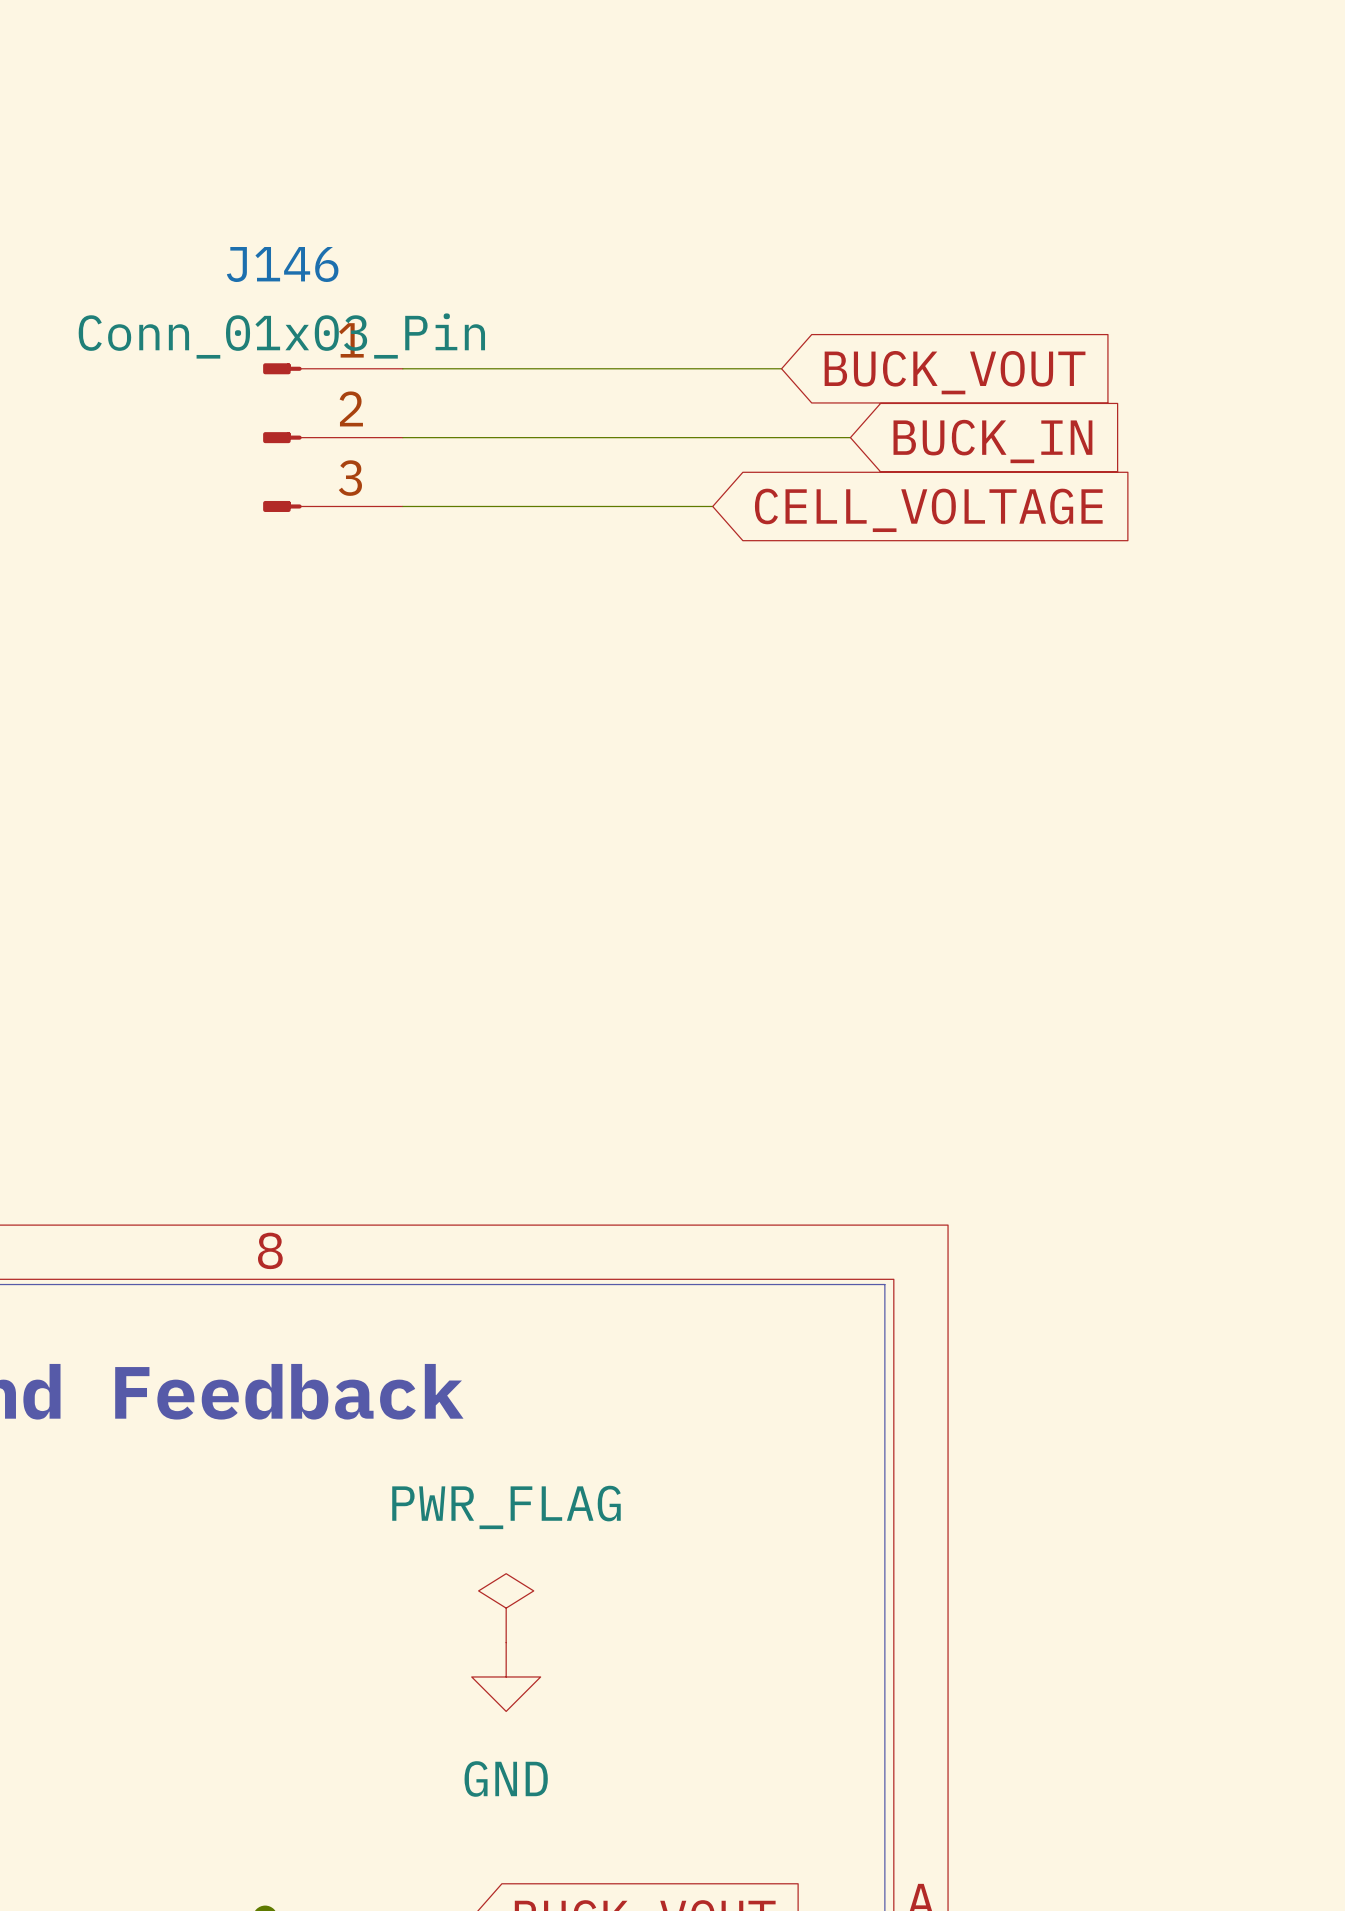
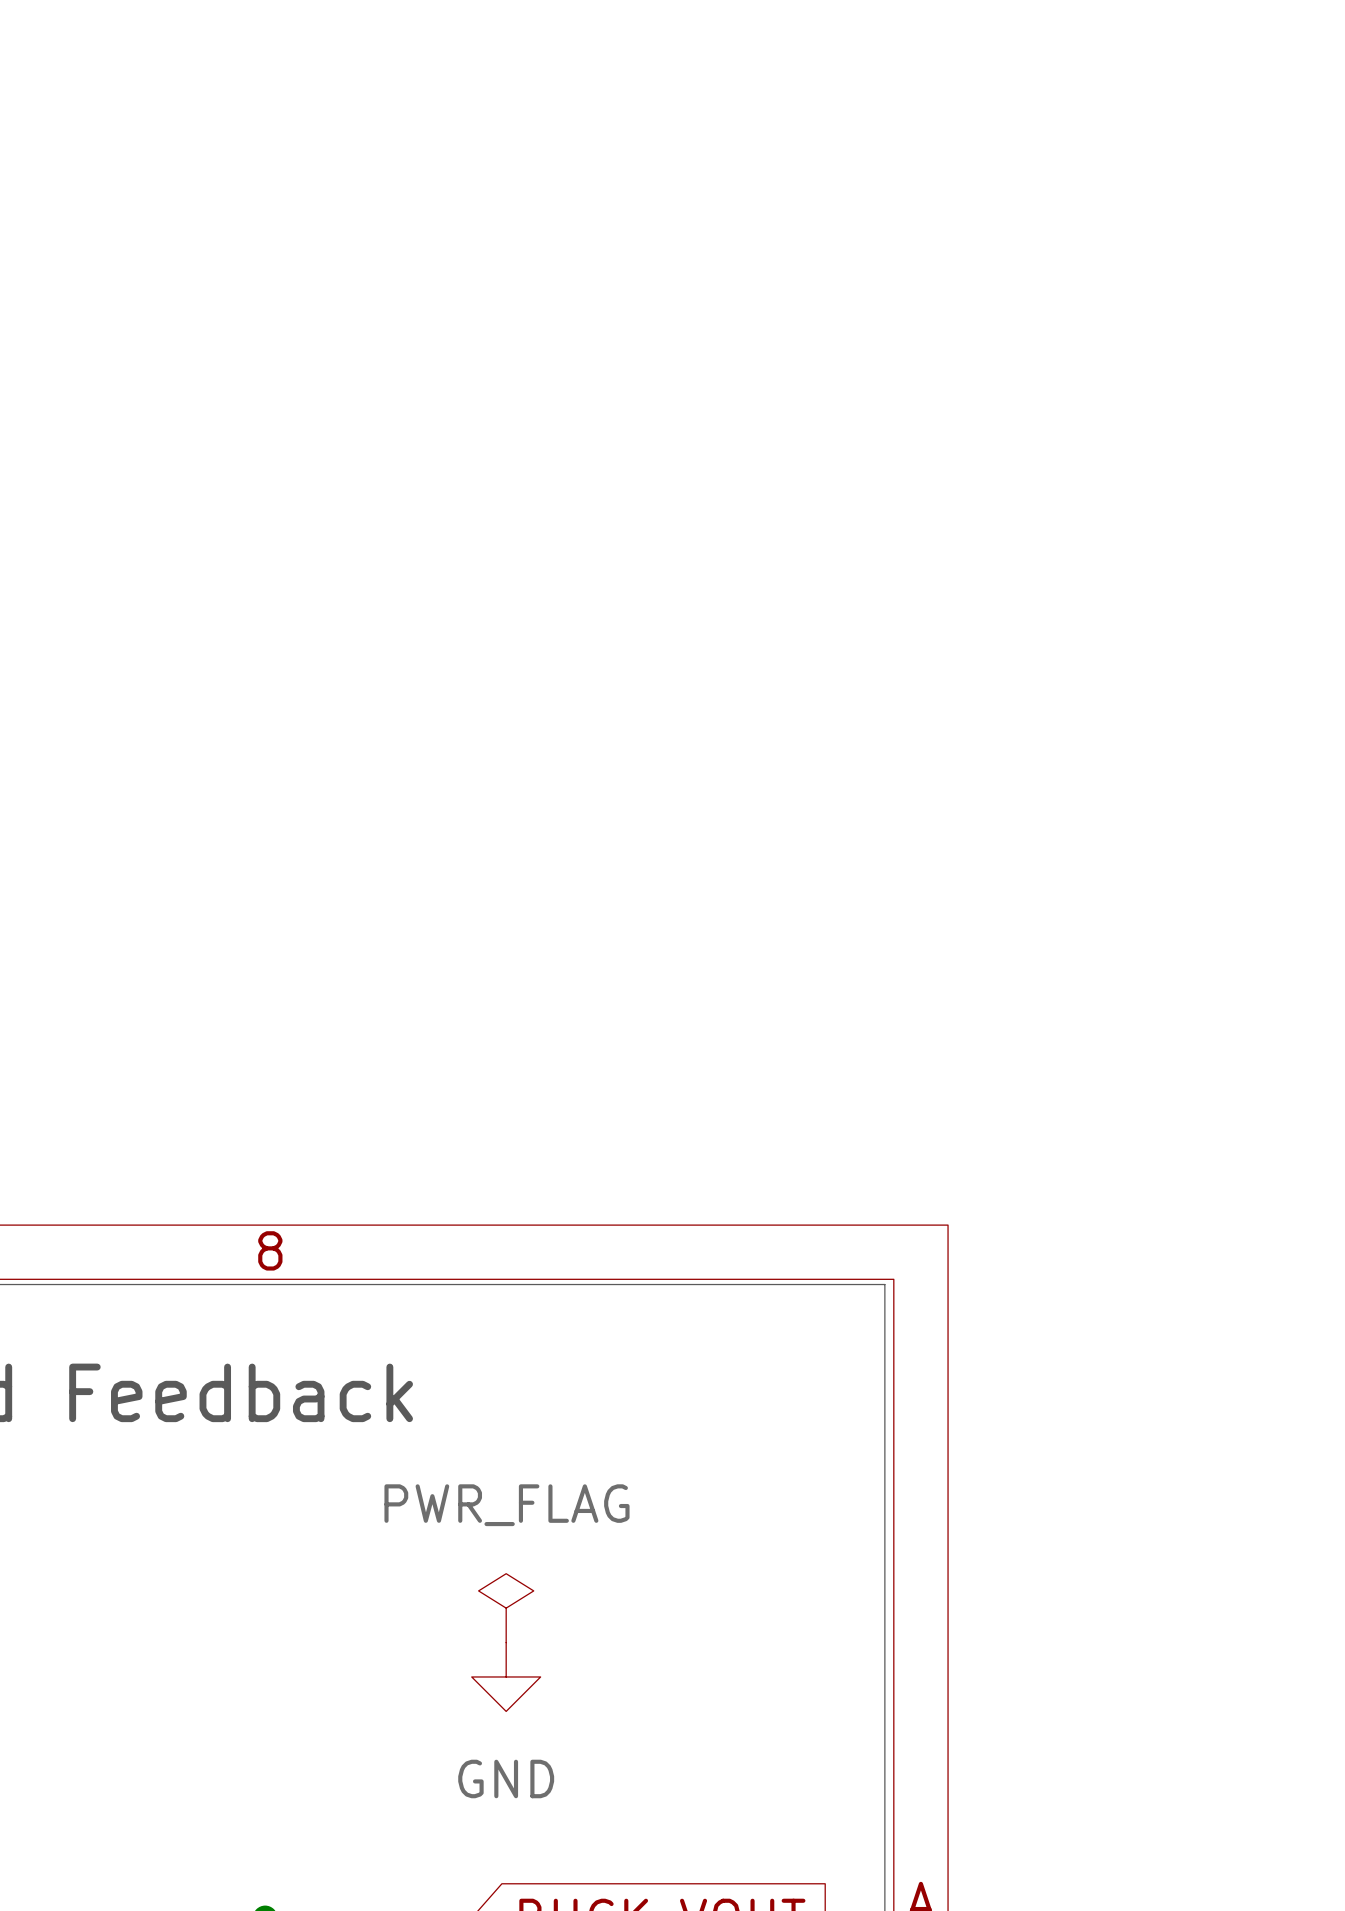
wire: (402, 368) (781, 368) -> none
global label: BUCK_VOUT (955, 372) -> none
J146: Conn_01x03_Pin (333, 437) -> none
wire: (402, 437) (850, 437) -> none
global label: BUCK_IN (992, 441) -> none
wire: (402, 506) (712, 506) -> none
global label: CELL_VOLTAGE (928, 510) -> none

